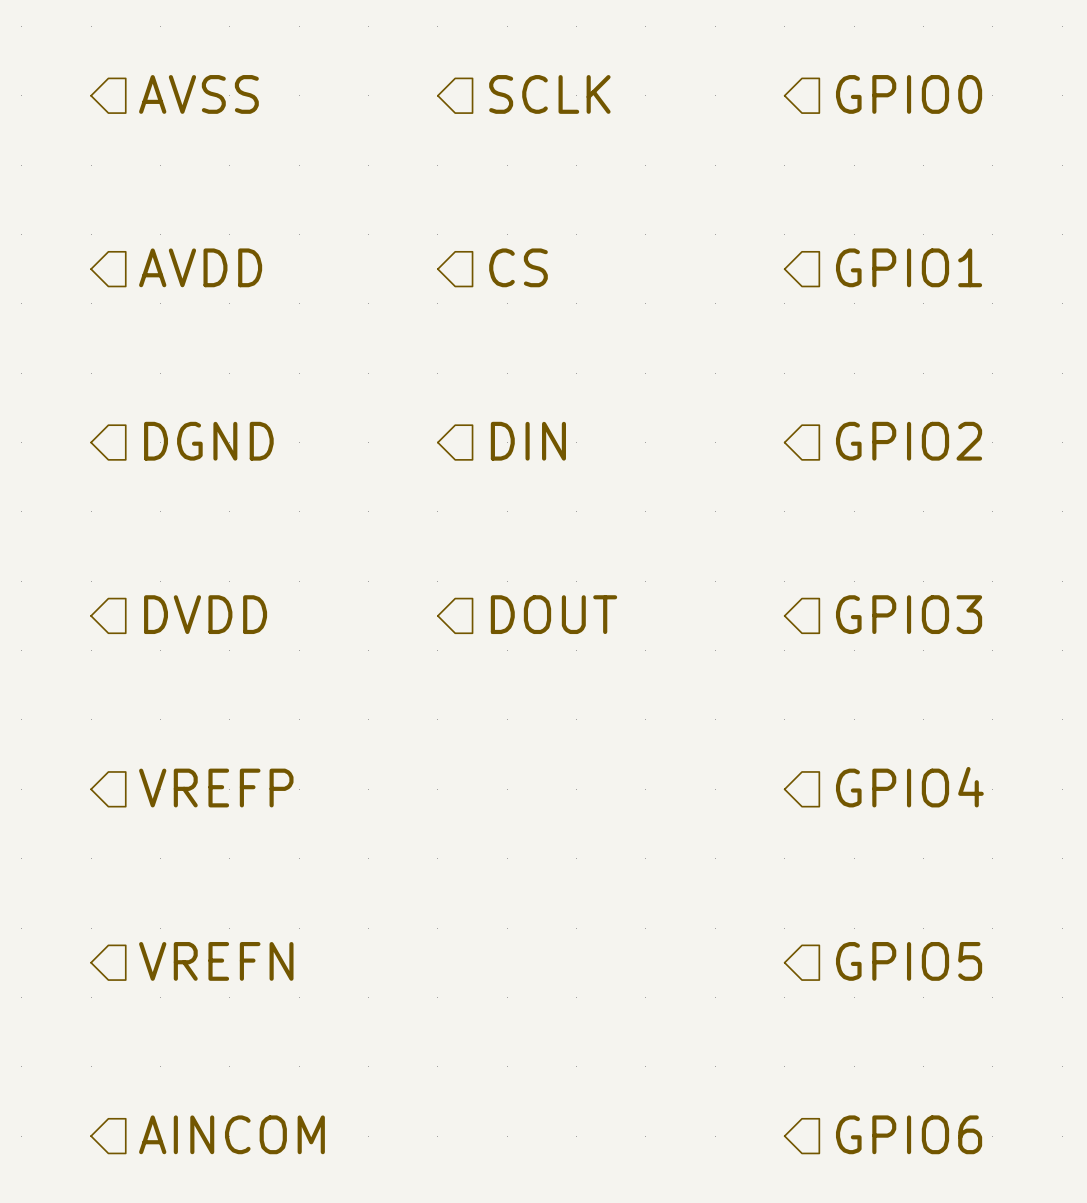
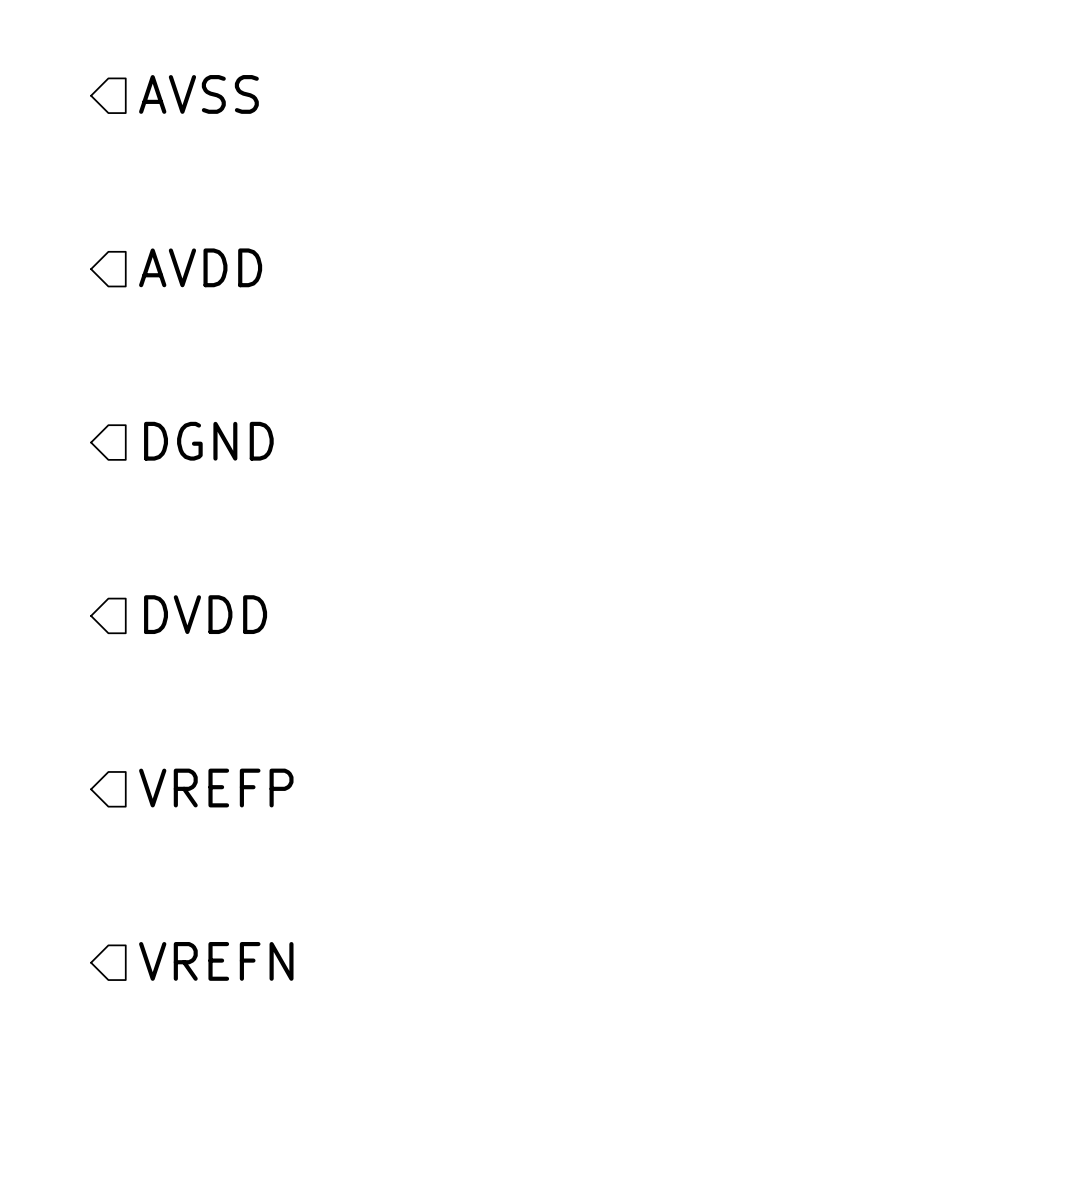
hierarchical label: SCLK (549, 94) -> none
hierarchical label: GPIO0 (909, 94) -> none
hierarchical label: CS (518, 267) -> none
hierarchical label: GPIO1 (909, 267) -> none
hierarchical label: DIN (528, 441) -> none
hierarchical label: GPIO2 (909, 441) -> none
hierarchical label: DOUT (554, 614) -> none
hierarchical label: GPIO3 (909, 614) -> none
hierarchical label: GPIO4 (909, 787) -> none
hierarchical label: GPIO5 (909, 961) -> none
hierarchical label: AINCOM (231, 1134) -> none
hierarchical label: GPIO6 (909, 1134) -> none

